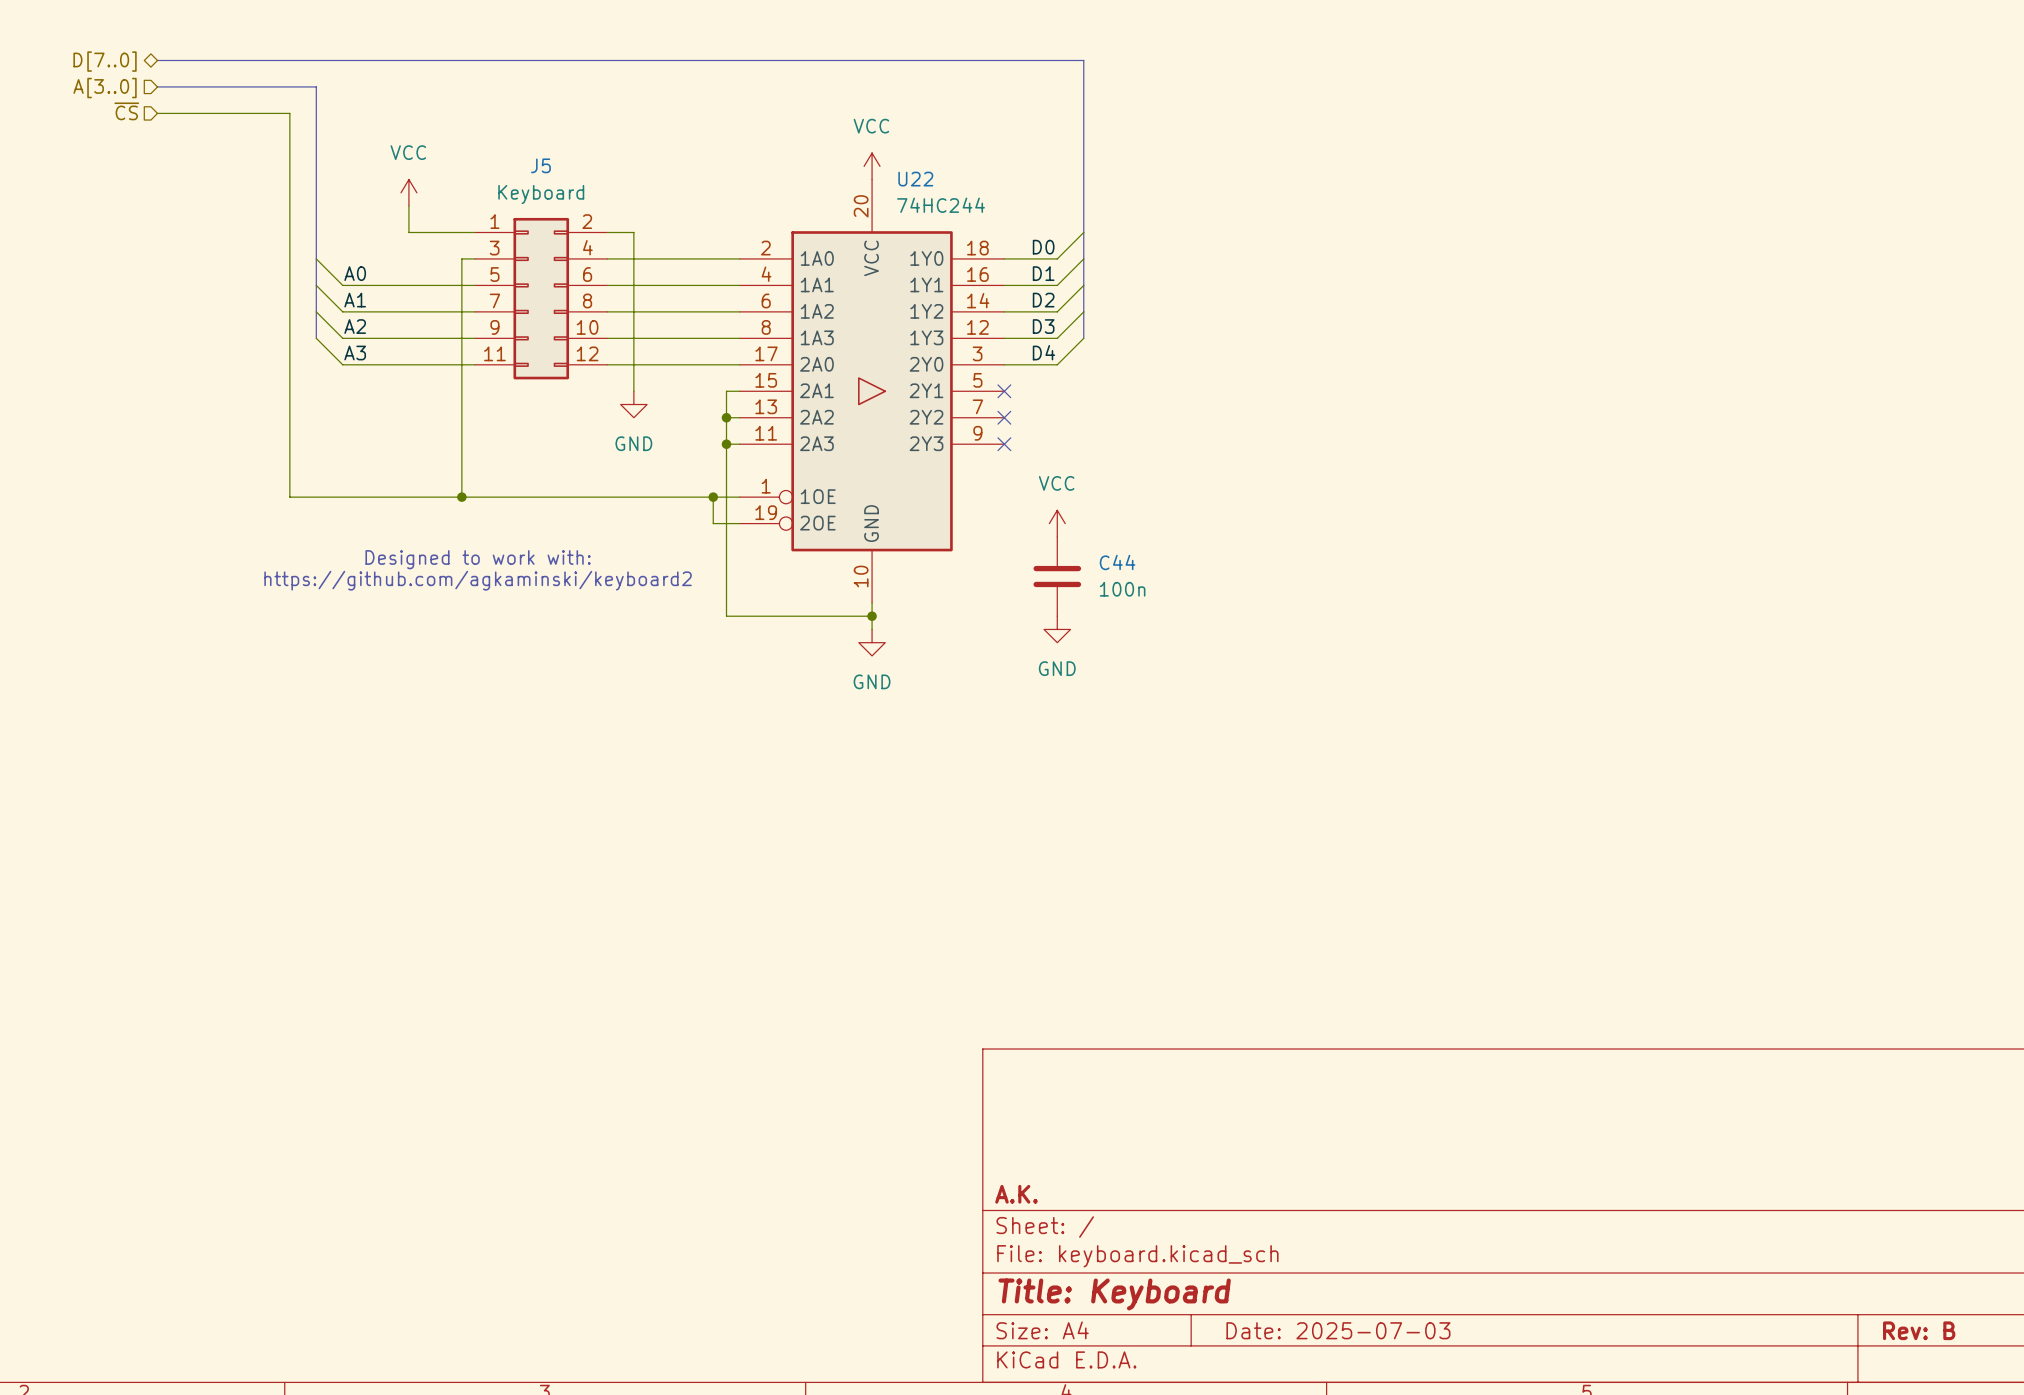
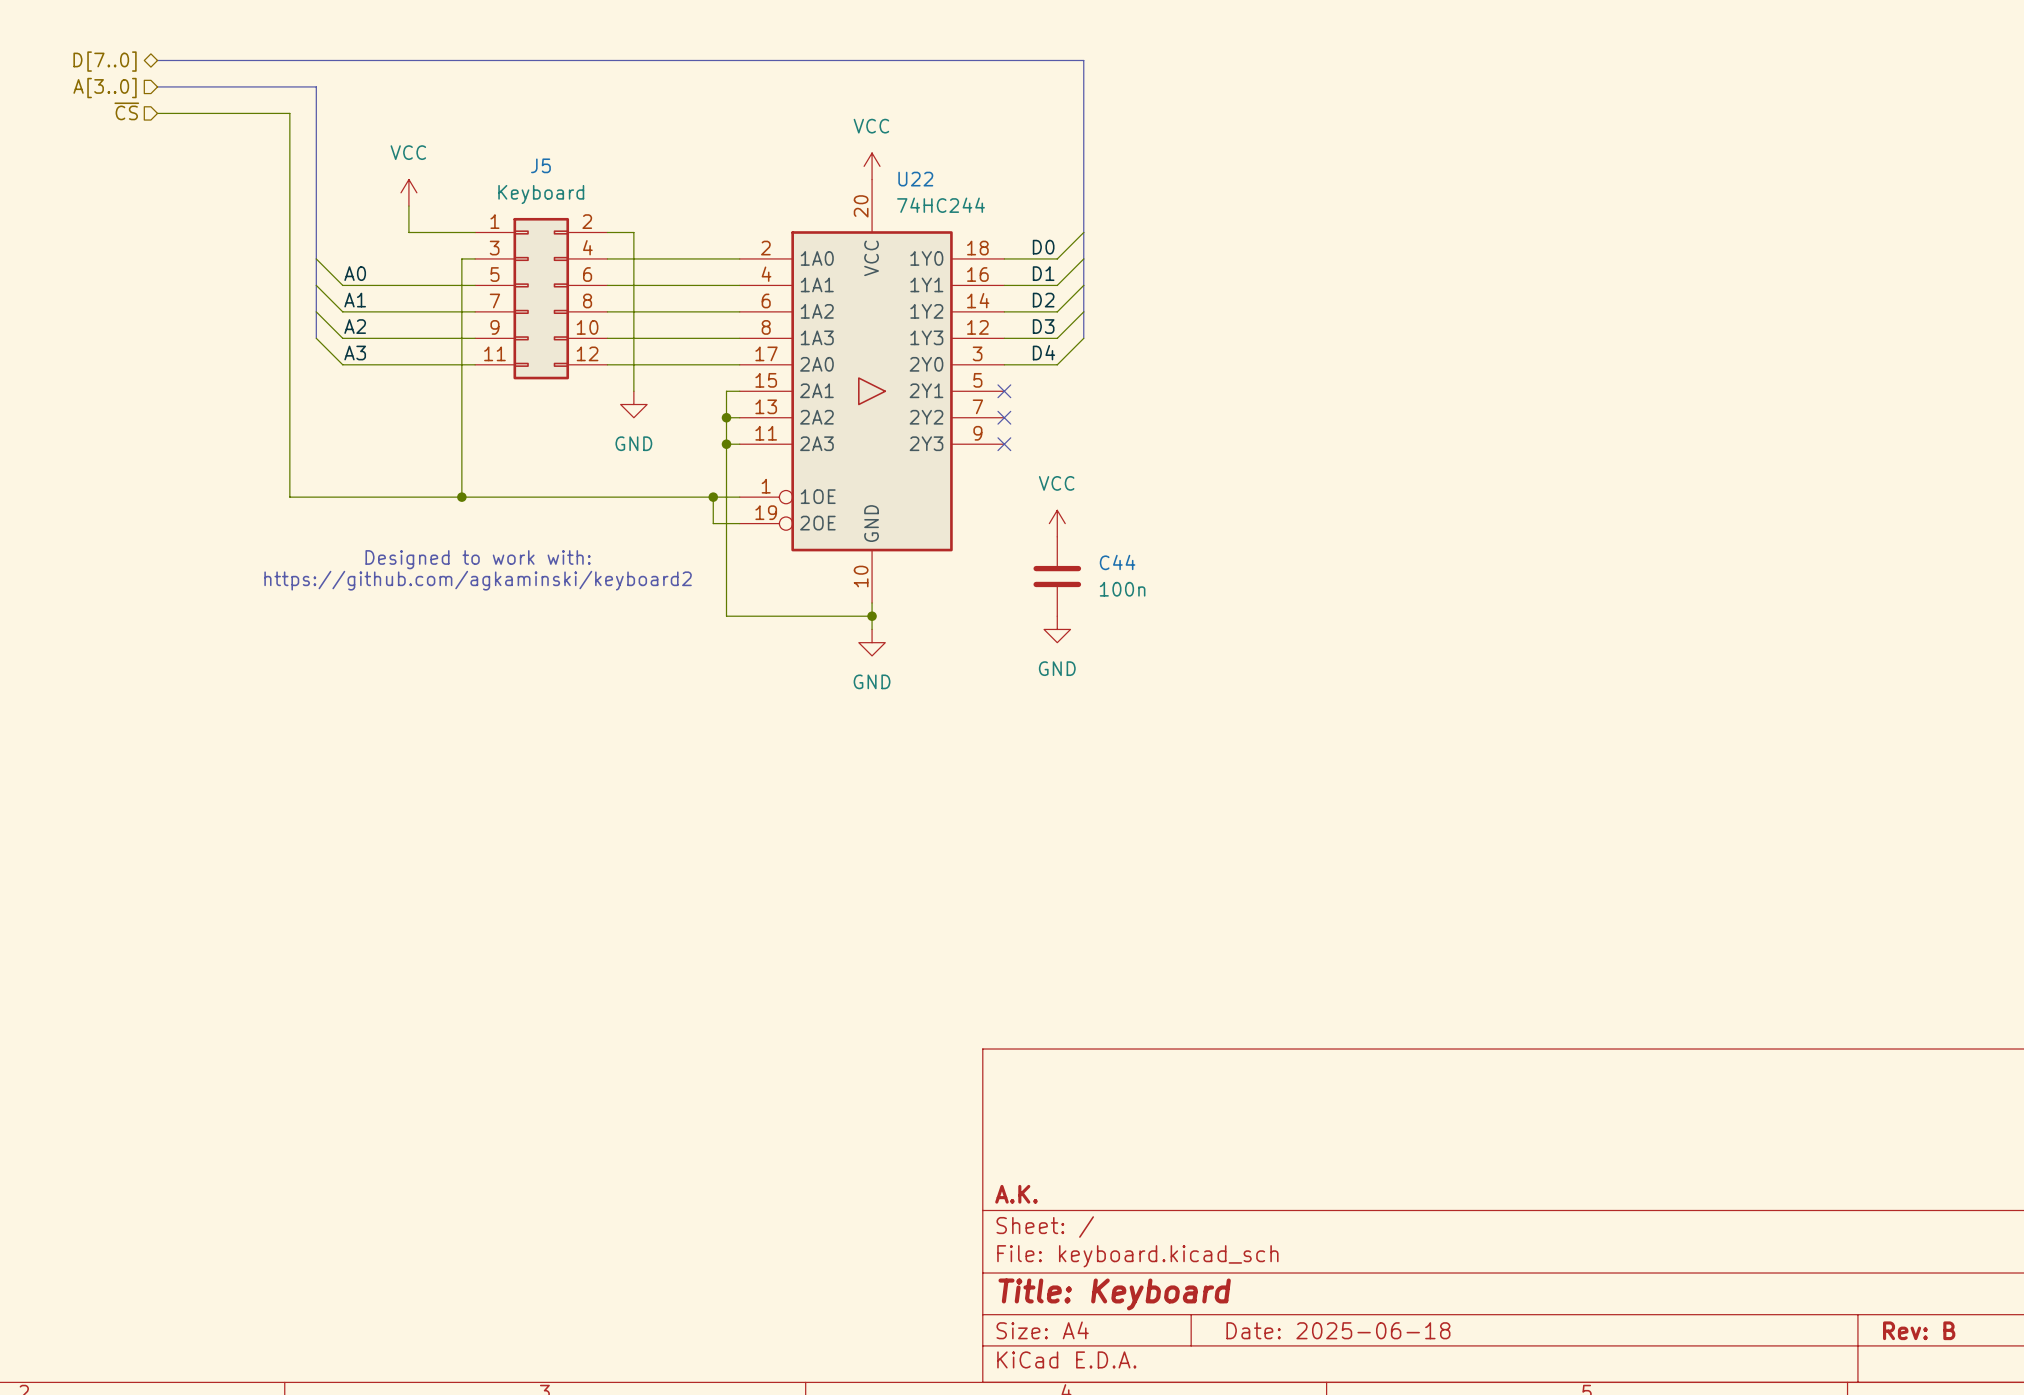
title block: Date: 2025-07-03 (1338, 1330) -> Date: 2025-06-18 (1338, 1330)

